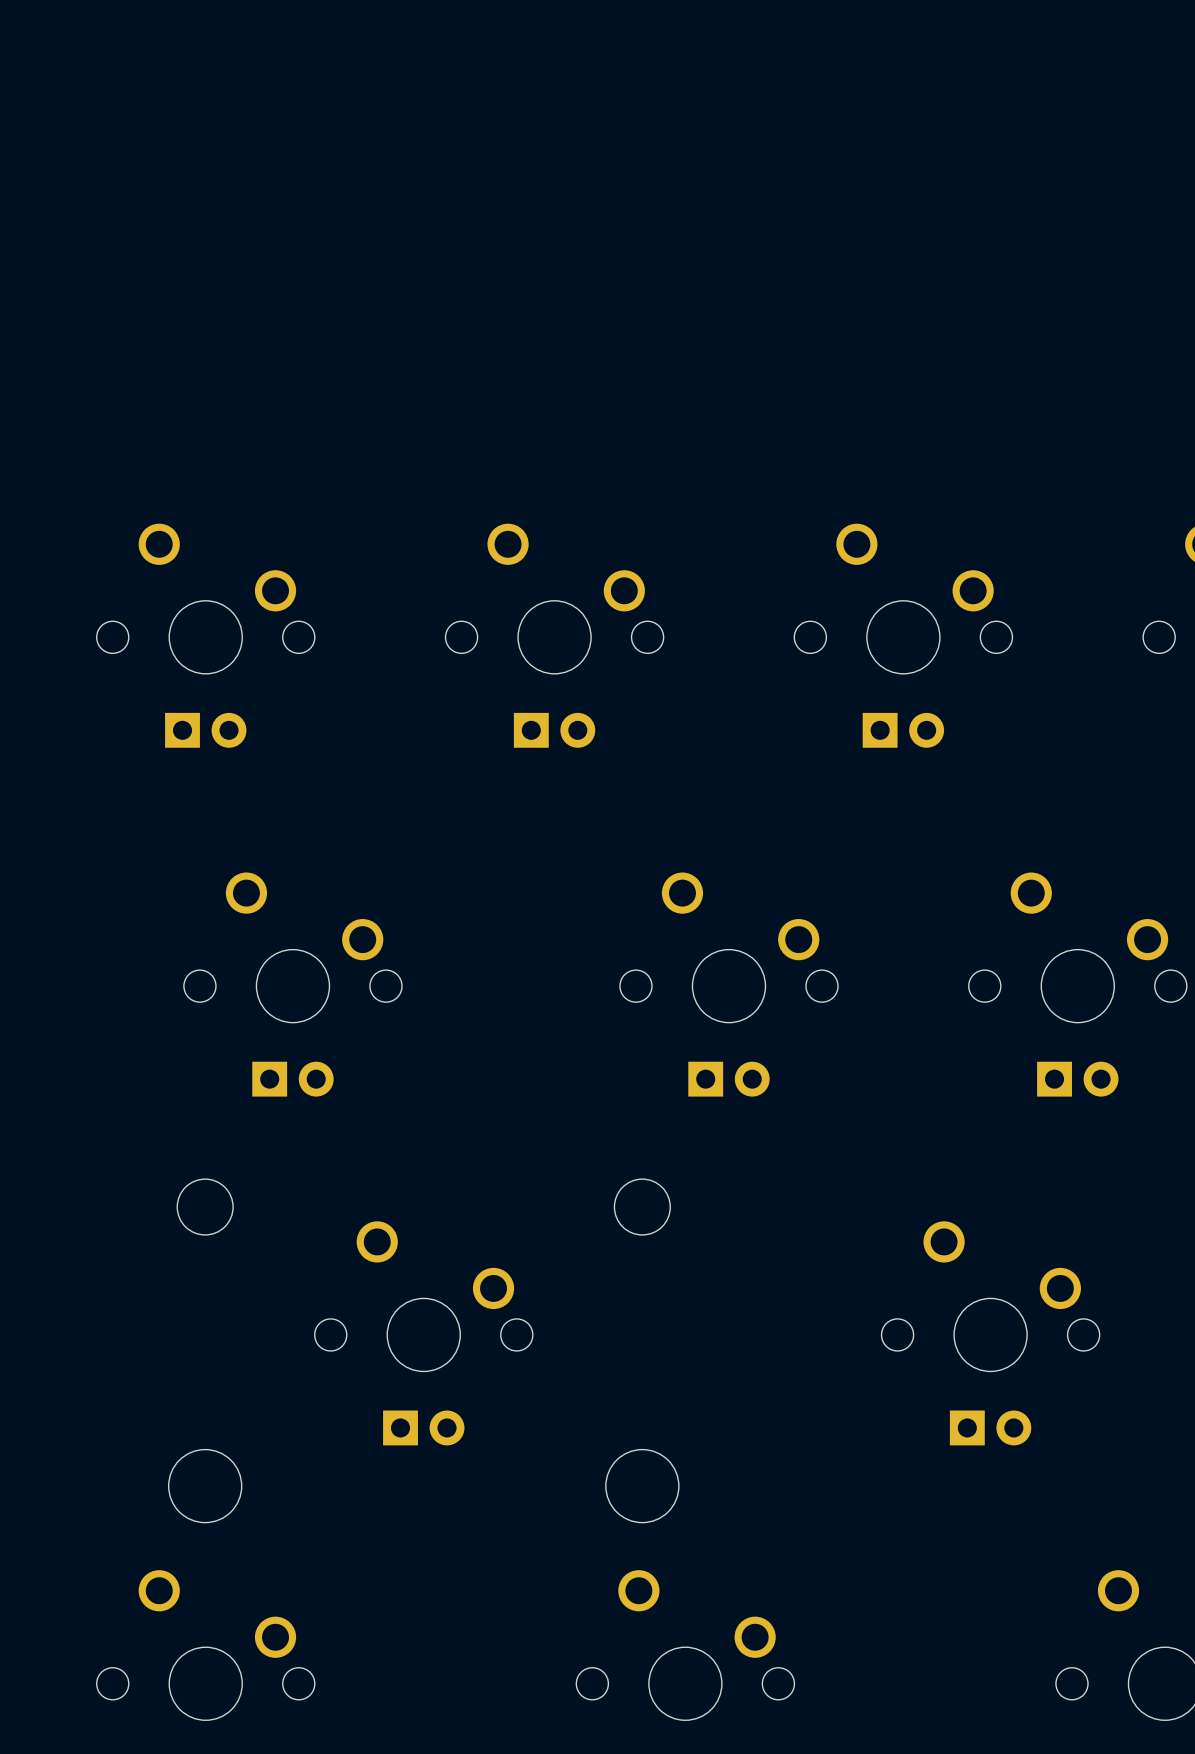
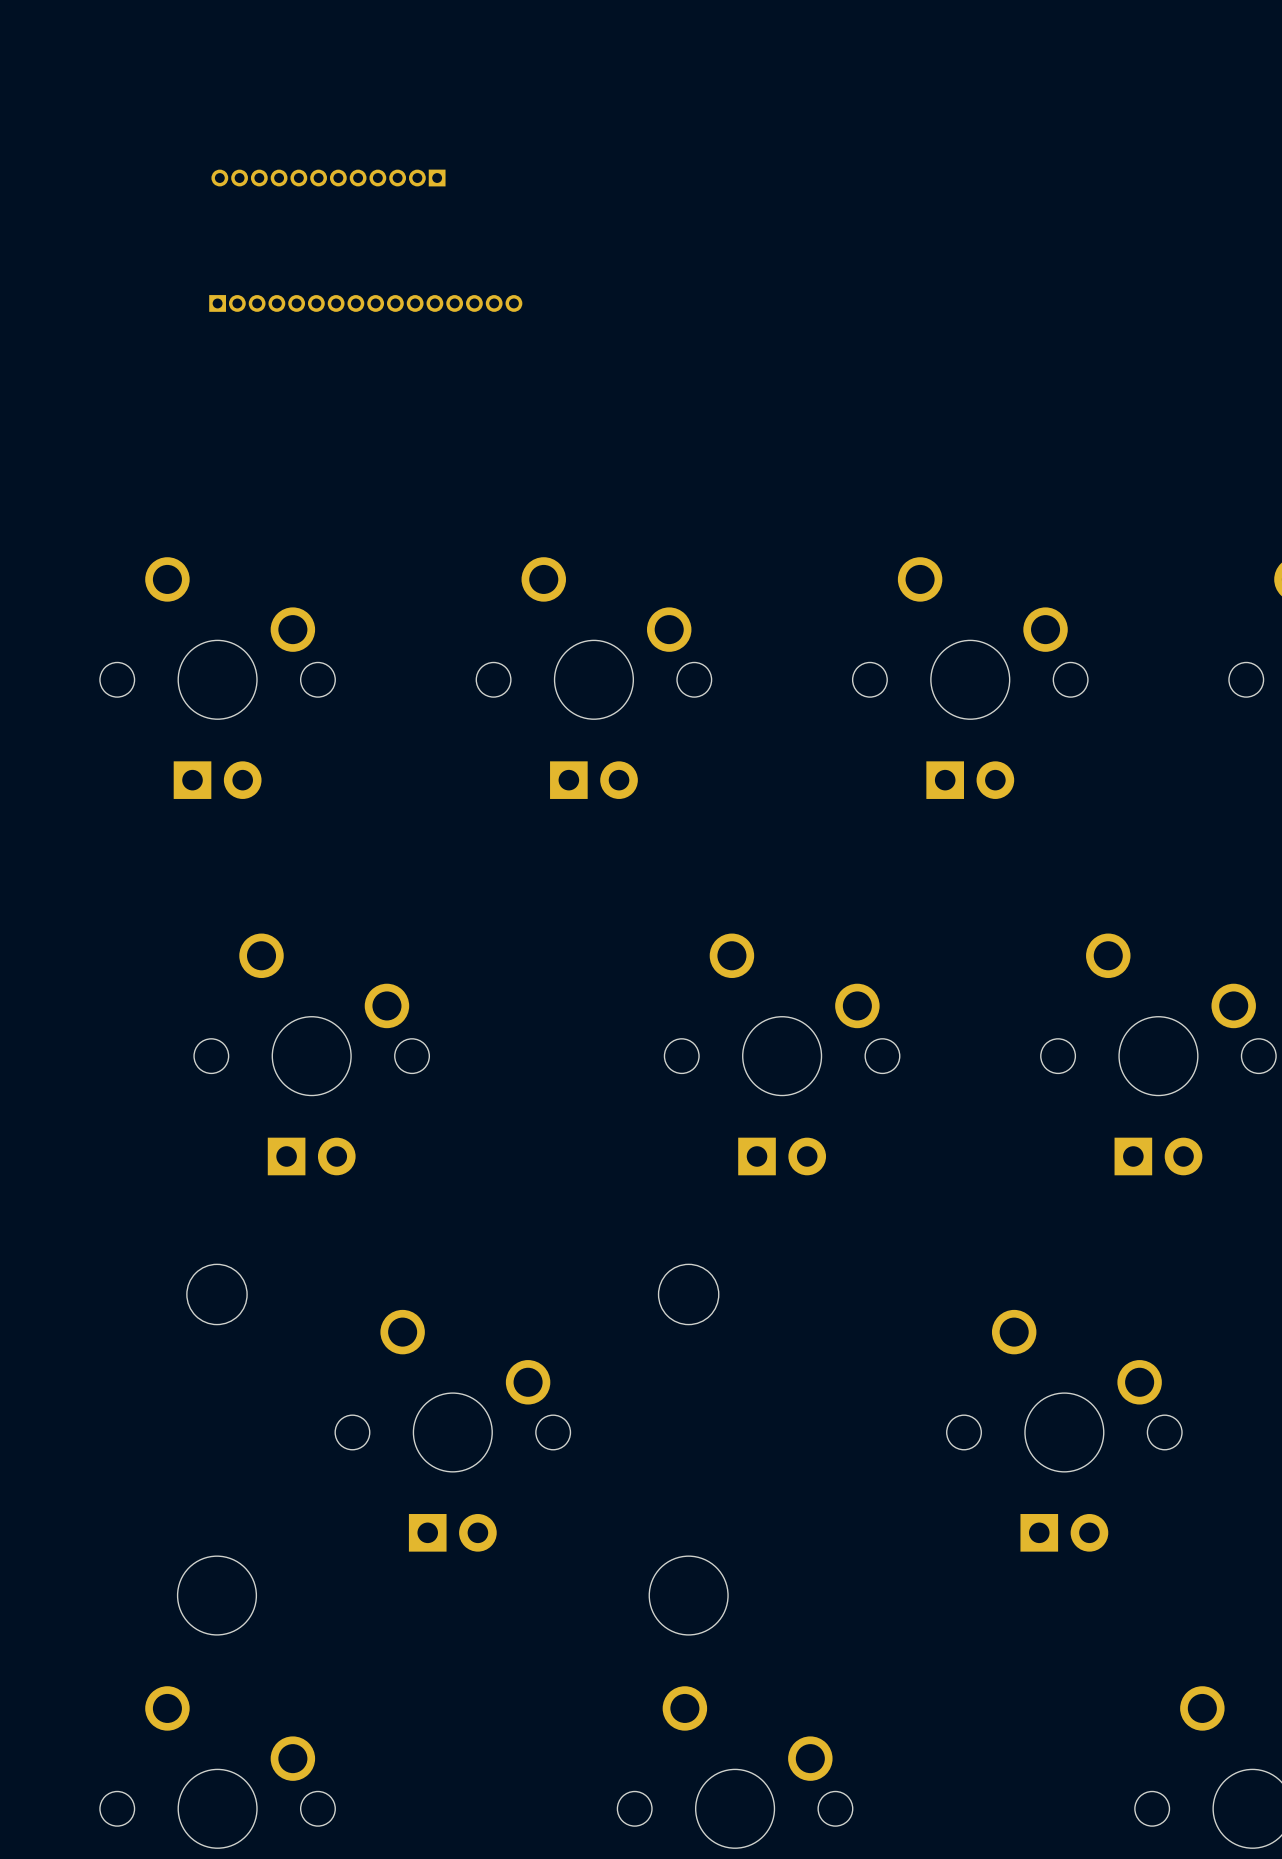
part: none -> (328, 178)
part: none -> (365, 303)

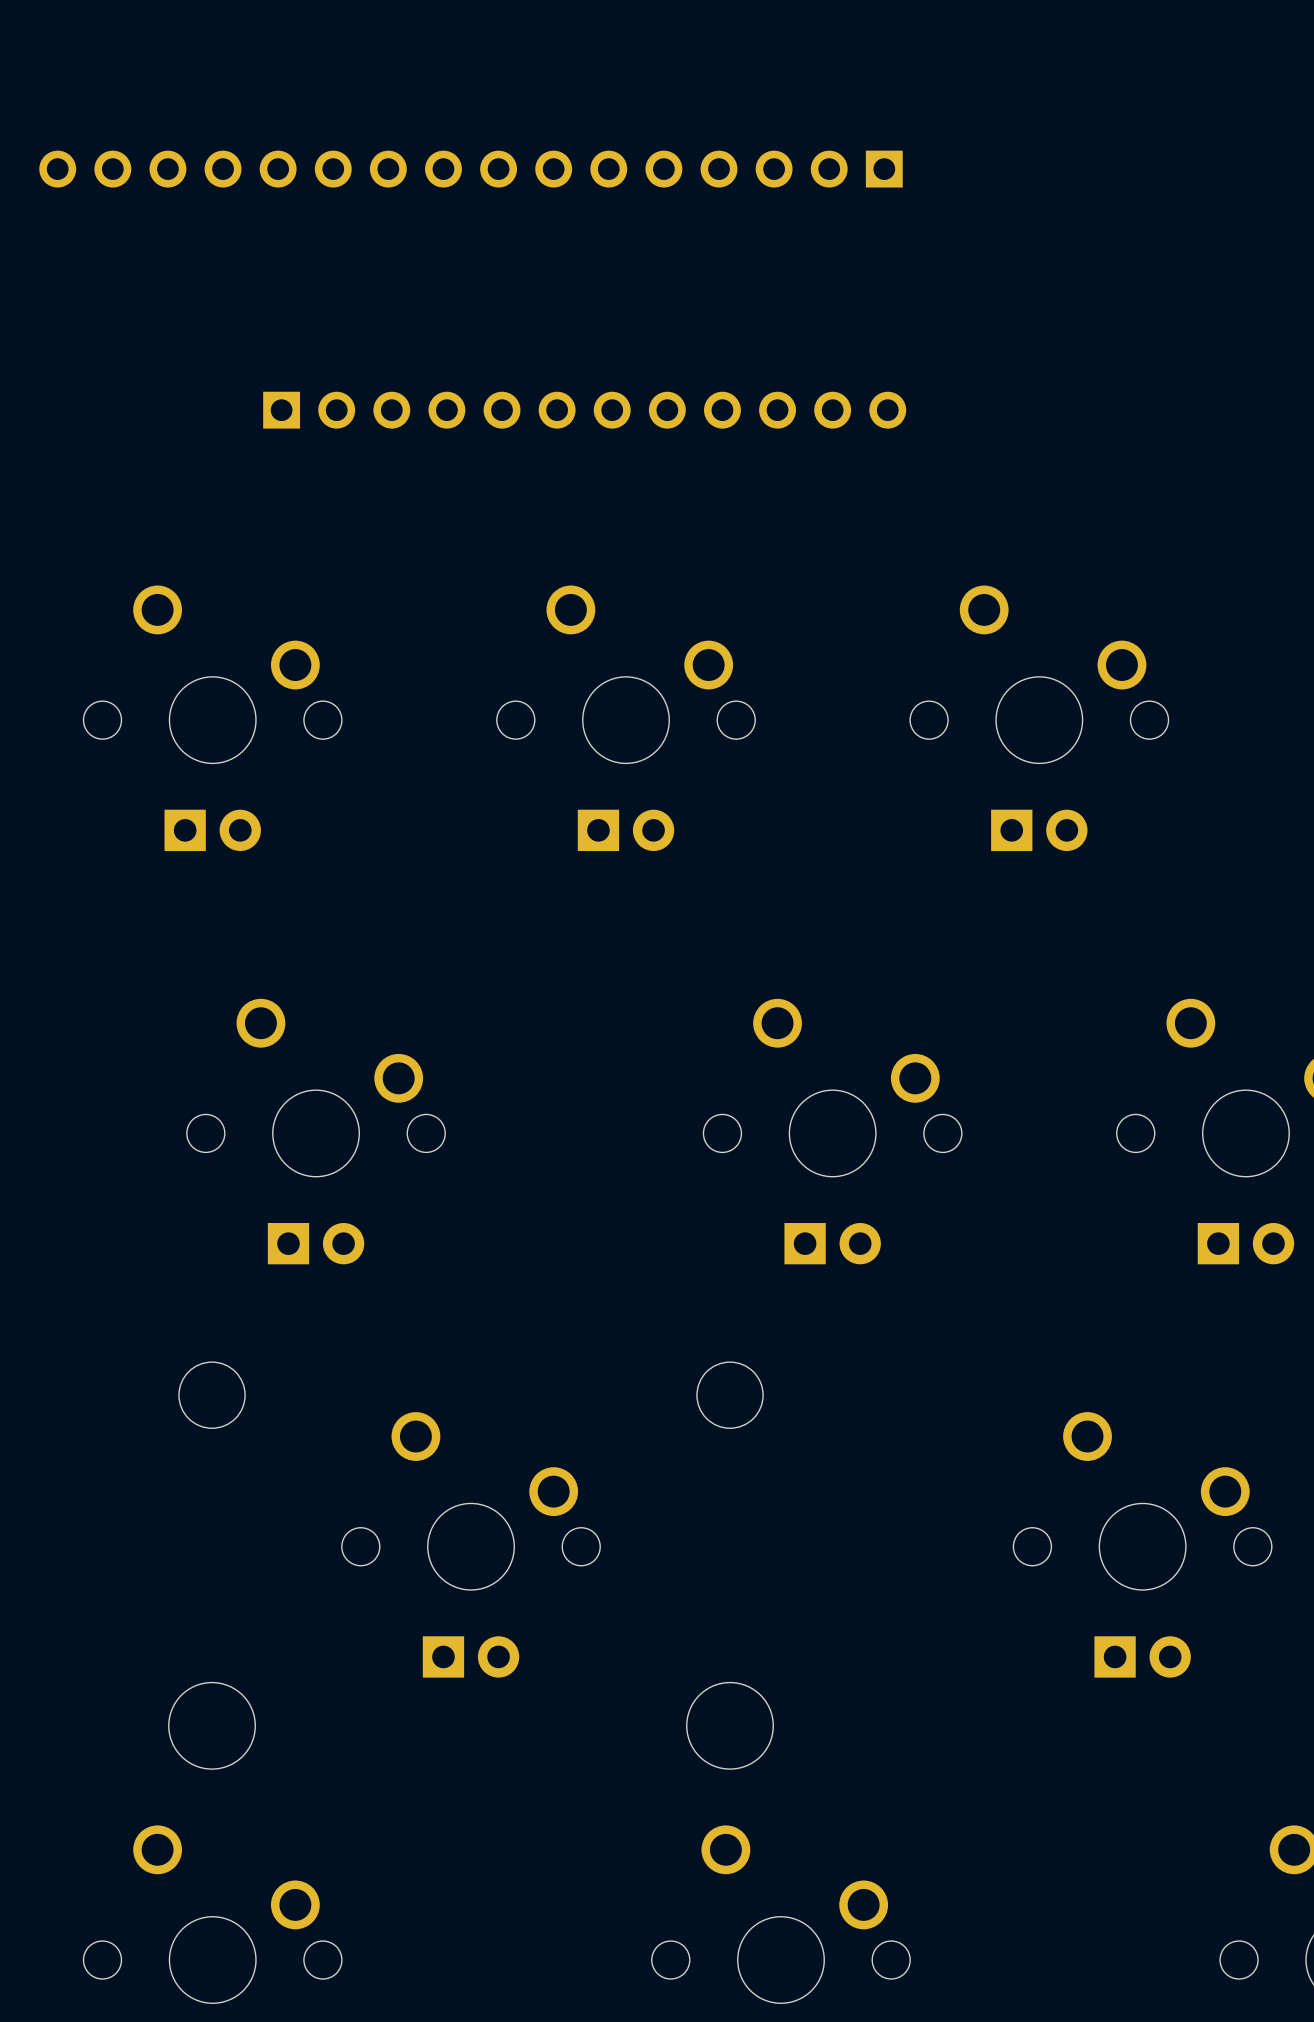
part: (328, 178) -> none
part: none -> (471, 169)
part: (365, 303) -> none
part: none -> (584, 410)

